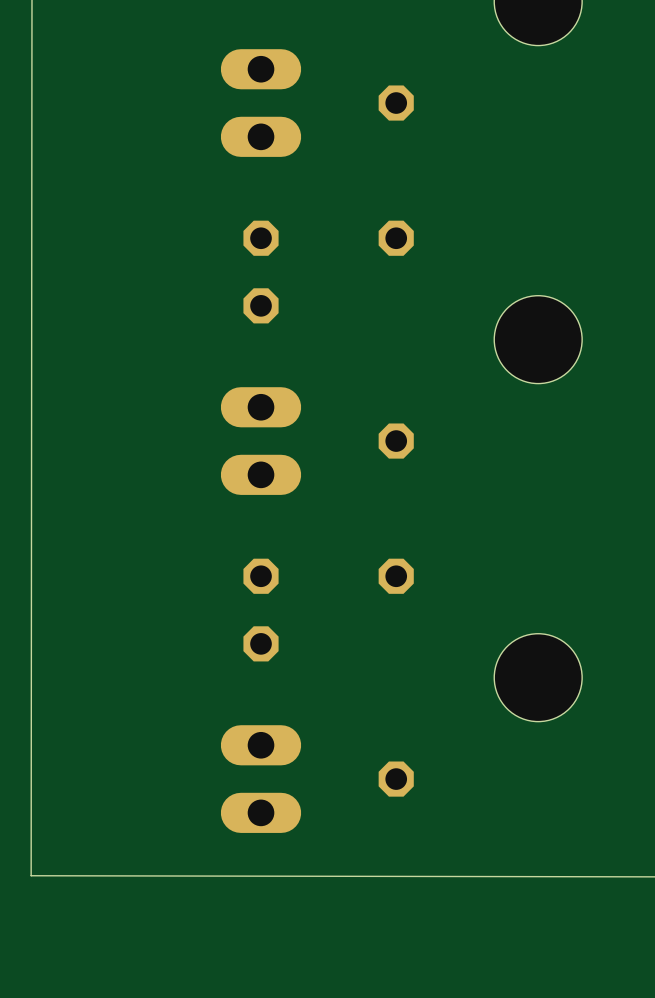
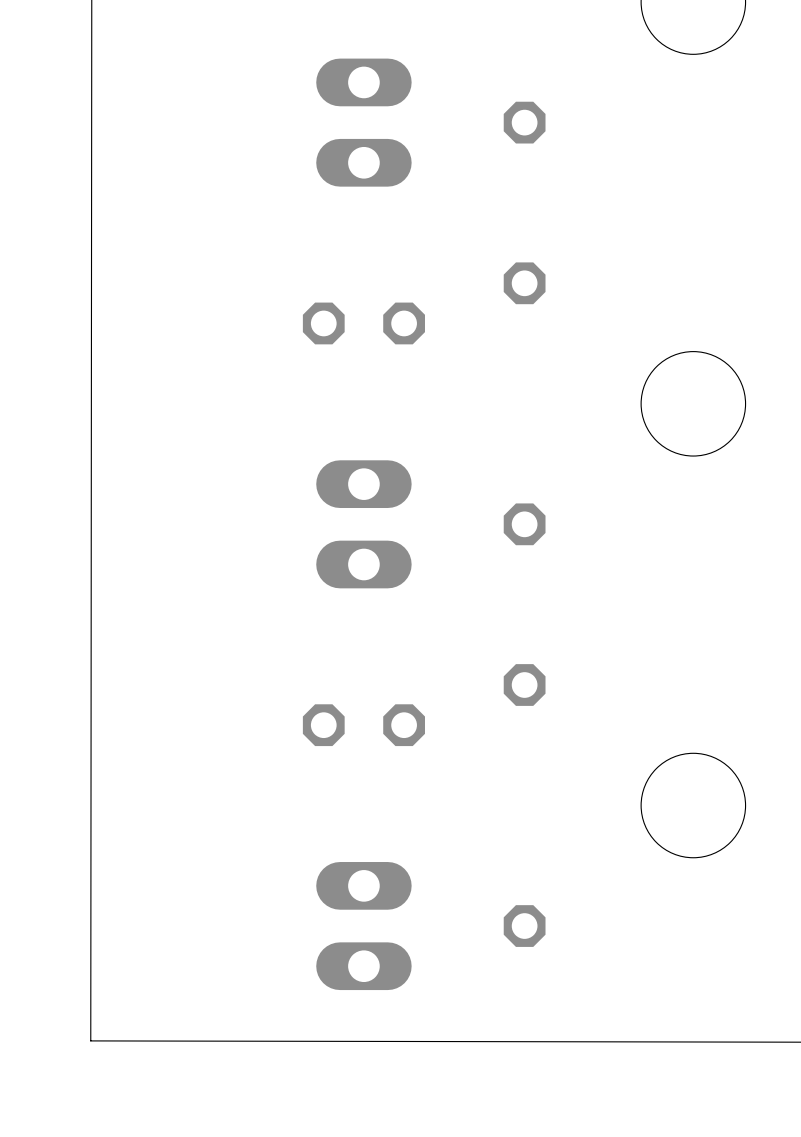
part rotation: 0° (261, 272) -> 90° clockwise (363, 323)
part rotation: 0° (261, 610) -> 90° clockwise (363, 725)

